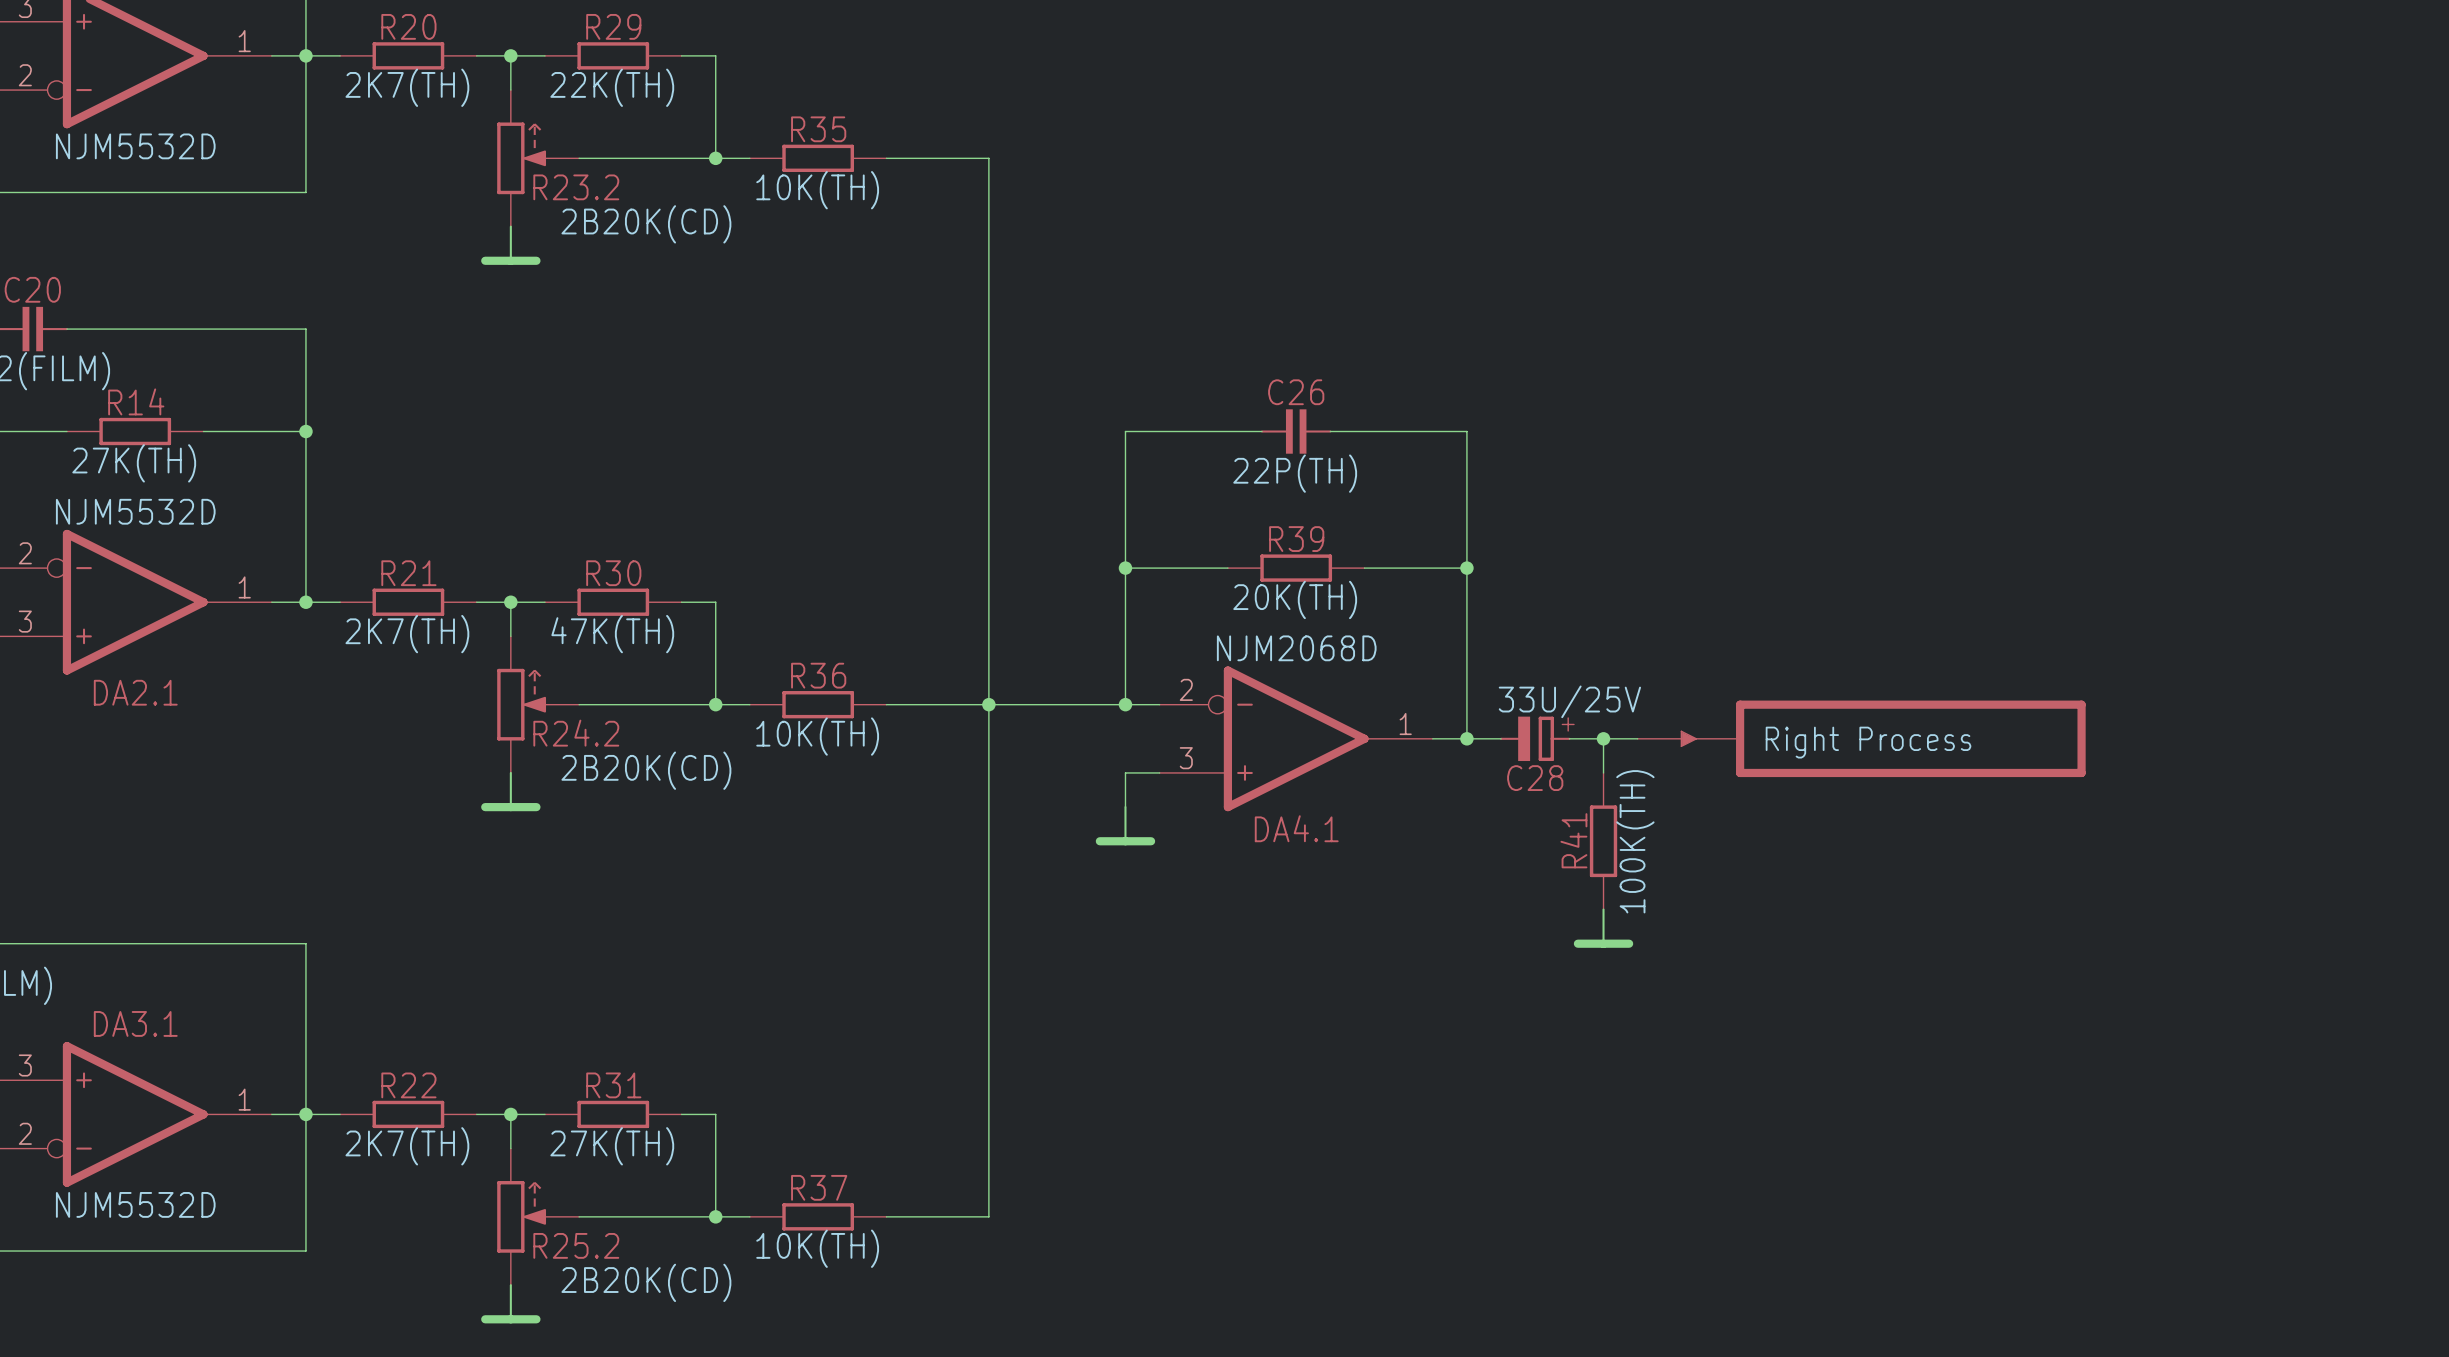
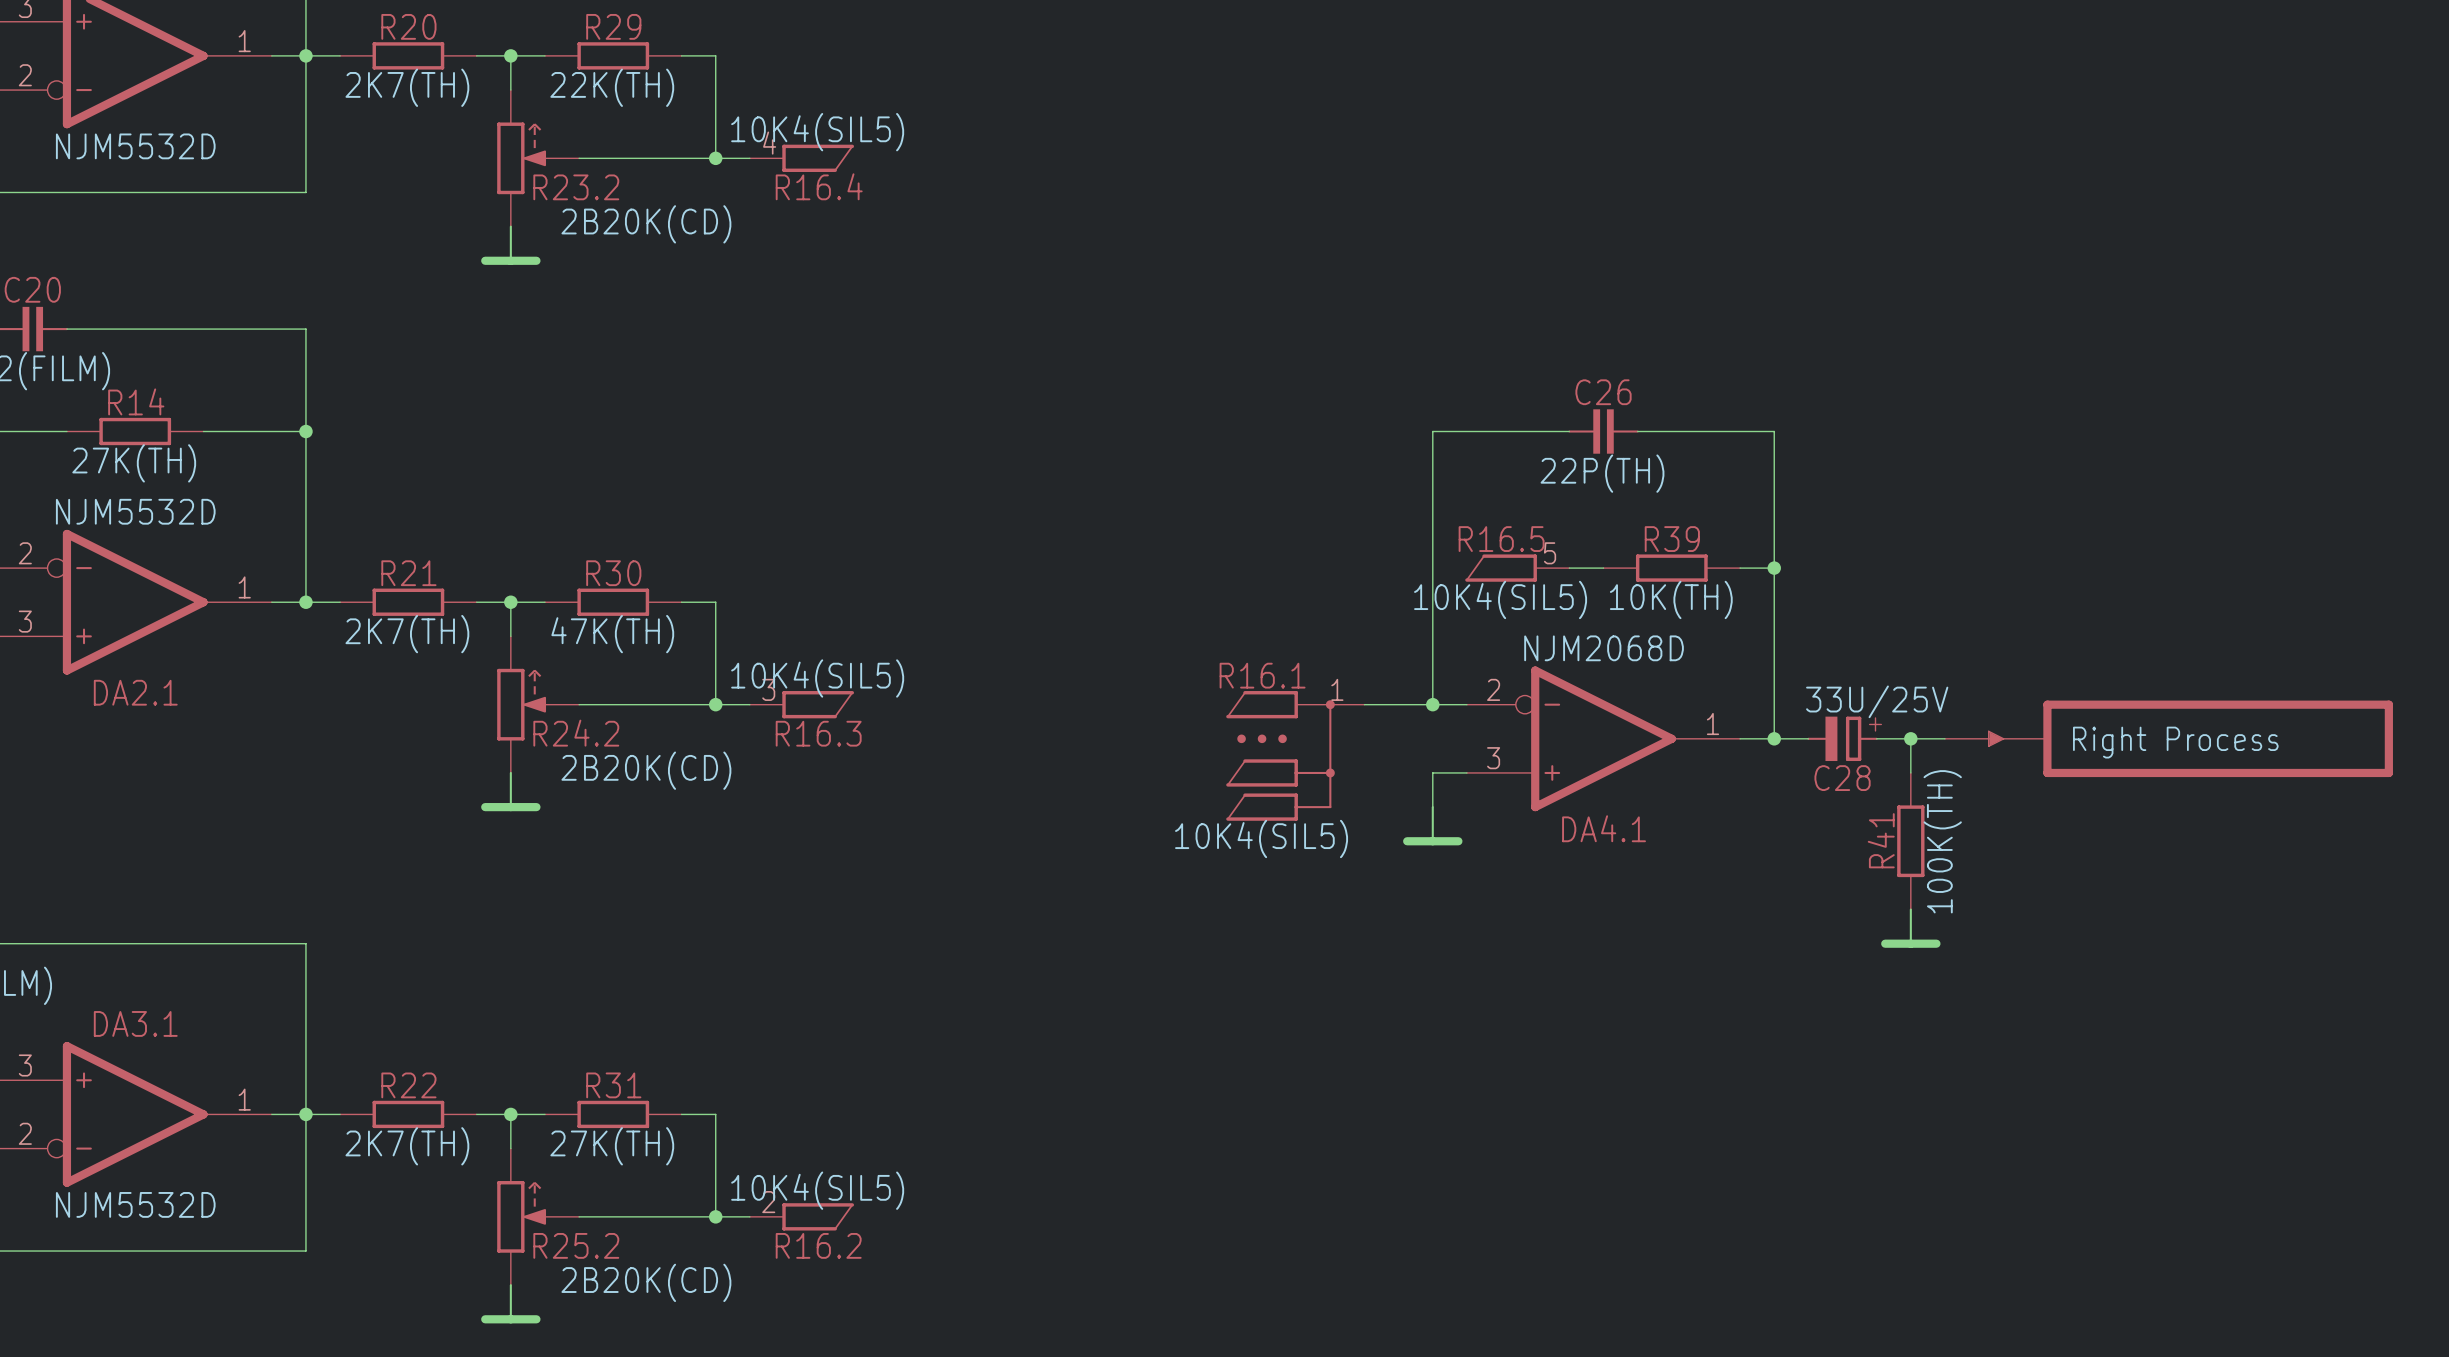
R16.4: none -> 10K4(SIL5) (801, 158)
R35: 10K(TH) (818, 158) -> none
wire: (886, 158) (988, 158) (988, 1216) (886, 1216) -> none
wire: (1262, 431) (1125, 431) (1125, 704) -> none
C26 position: (1296, 431) -> (1603, 431)
wire: (1330, 431) (1432, 431) -> (1432, 704) (1432, 431)
wire: (1466, 431) (1466, 738) -> (1466, 431) (1569, 431)
wire: none -> (1637, 431) (1774, 431) (1774, 738)
wire: (1125, 568) (1227, 568) -> none
junction: (1125, 568) -> none
R39 position: (1296, 568) -> (1671, 568)
wire: (1364, 568) (1466, 568) -> (1364, 704) (1466, 704)
junction: (1466, 568) -> none
R16.5: none -> 10K4(SIL5) (1517, 568)
wire: none -> (1569, 568) (1603, 568)
wire: none -> (1740, 568) (1774, 568)
junction: none -> (1774, 568)
R39 value: 20K(TH) (1295, 599) -> 10K(TH) (1671, 599)
R16.3: none -> 10K4(SIL5) (801, 704)
R36: 10K(TH) (818, 704) -> none
wire: (886, 704) (1159, 704) -> none
junction: (988, 704) -> none
junction: (1125, 704) -> none
DA4.1 position: (1296, 738) -> (1603, 738)
wire: (1432, 738) (1501, 738) -> (1740, 738) (1808, 738)
junction position: (1466, 738) -> (1432, 704)
C28 position: (1535, 738) -> (1842, 738)
wire: (1569, 738) (1637, 738) -> (1876, 738) (1944, 738)
wire: (1603, 738) (1603, 772) -> (1910, 738) (1910, 772)
junction: (1603, 738) -> none
junction: none -> (1774, 738)
part position: (1861, 738) -> (2168, 738)
junction: none -> (1910, 738)
R16.1: none -> 10K4(SIL5) (1295, 755)
wire: (1159, 772) (1125, 772) (1125, 807) -> (1466, 772) (1432, 772) (1432, 807)
power symbol: (1125, 825) -> none
power symbol: none -> (1432, 825)
R41 position: (1603, 841) -> (1910, 841)
power symbol: (1603, 928) -> none
power symbol: none -> (1910, 928)
R16.2: none -> 10K4(SIL5) (801, 1216)
R37: 10K(TH) (818, 1216) -> none

